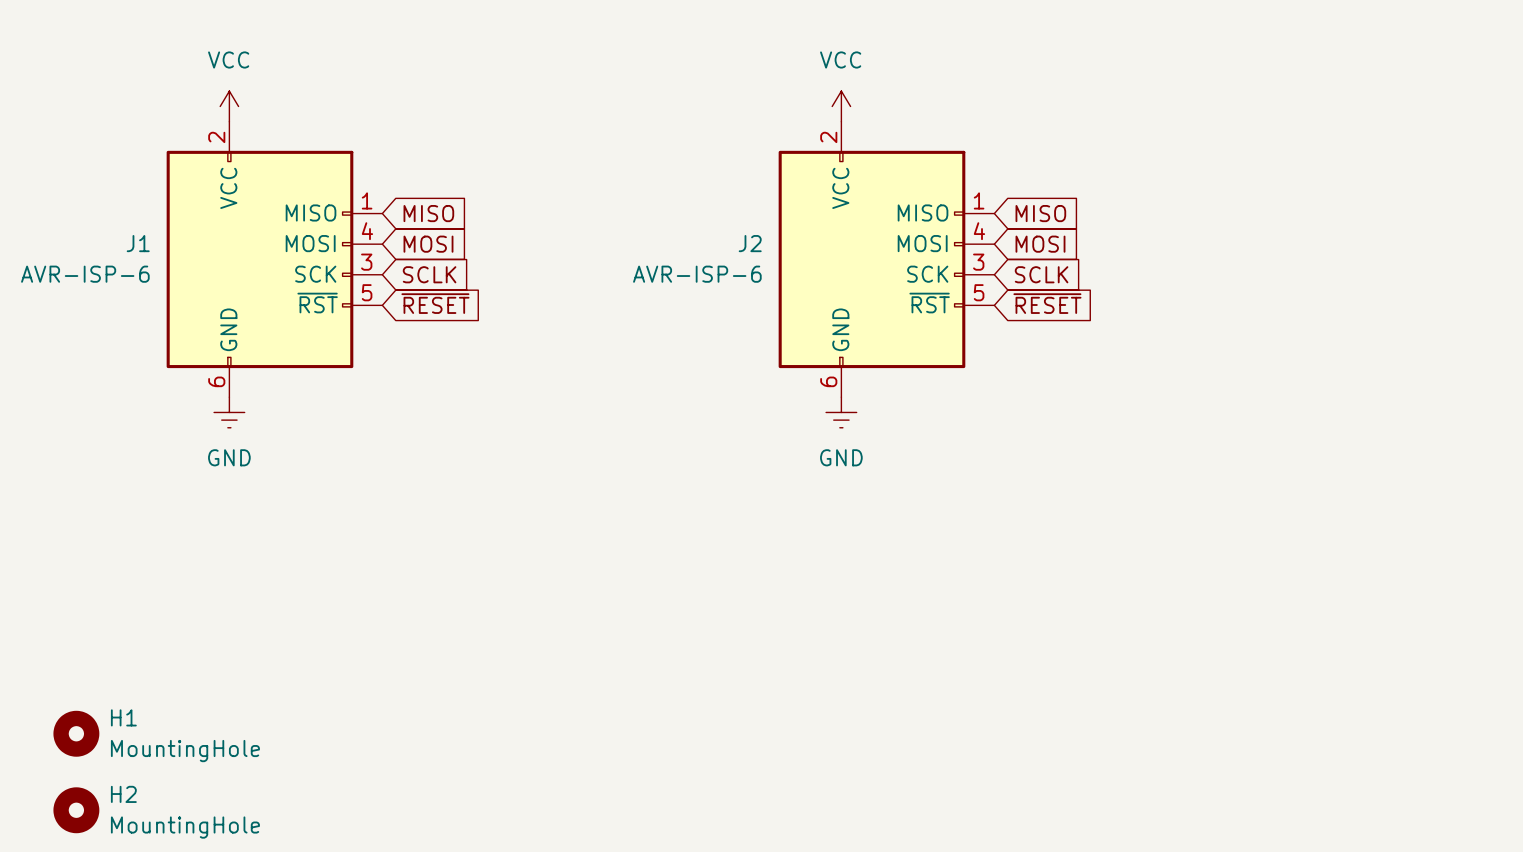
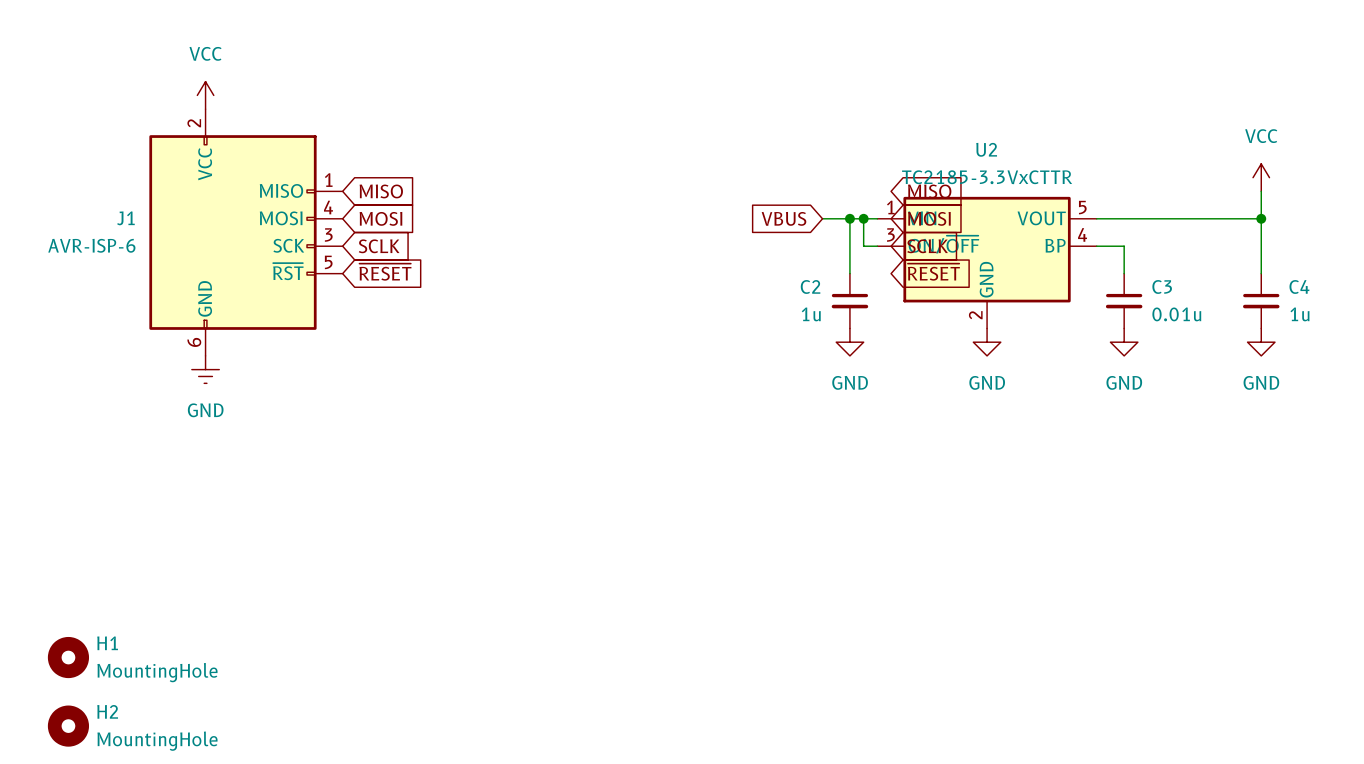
power symbol: VCC (841, 106) -> none
power symbol: none -> VCC (1261, 177)
wire: none -> (1261, 191) (1261, 273)
global label: none -> VBUS (783, 218)
junction: none -> (849, 218)
junction: none -> (863, 218)
wire: none -> (1096, 218) (1261, 218)
junction: none -> (1261, 218)
J2: AVR-ISP-6 (886, 259) -> none
wire: none -> (1096, 246) (1124, 246) (1124, 273)
U2: none -> TC2185-3.3VxCTTR (987, 262)
C2: none -> 1u (849, 301)
C3: none -> 0.01u (1124, 301)
C4: none -> 1u (1261, 301)
power symbol: none -> GND (849, 342)
power symbol: none -> GND (987, 342)
power symbol: none -> GND (1124, 342)
power symbol: none -> GND (1261, 342)
power symbol: GND (841, 412) -> none

